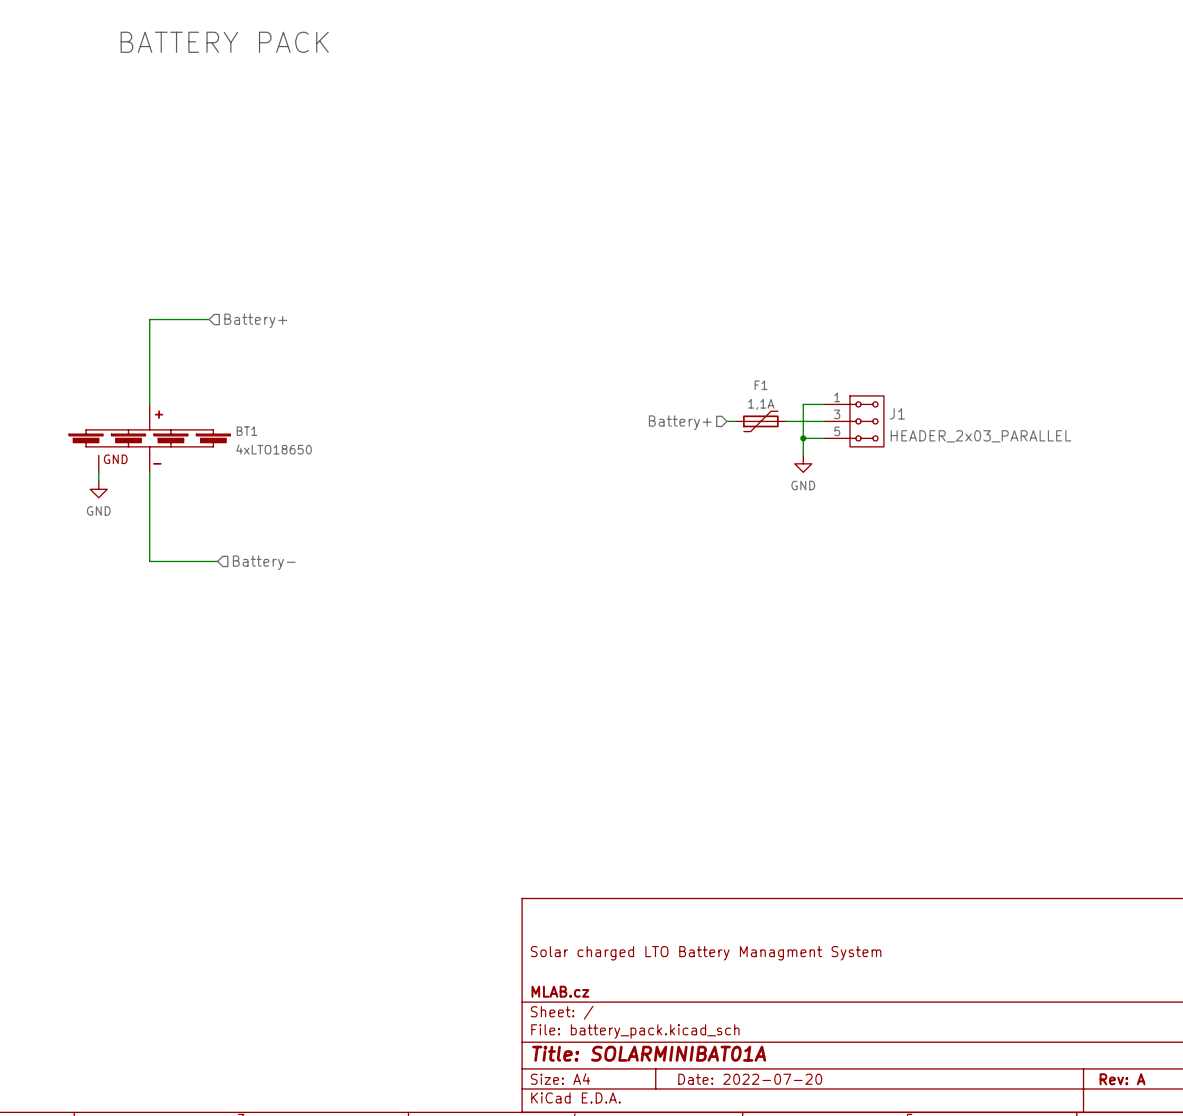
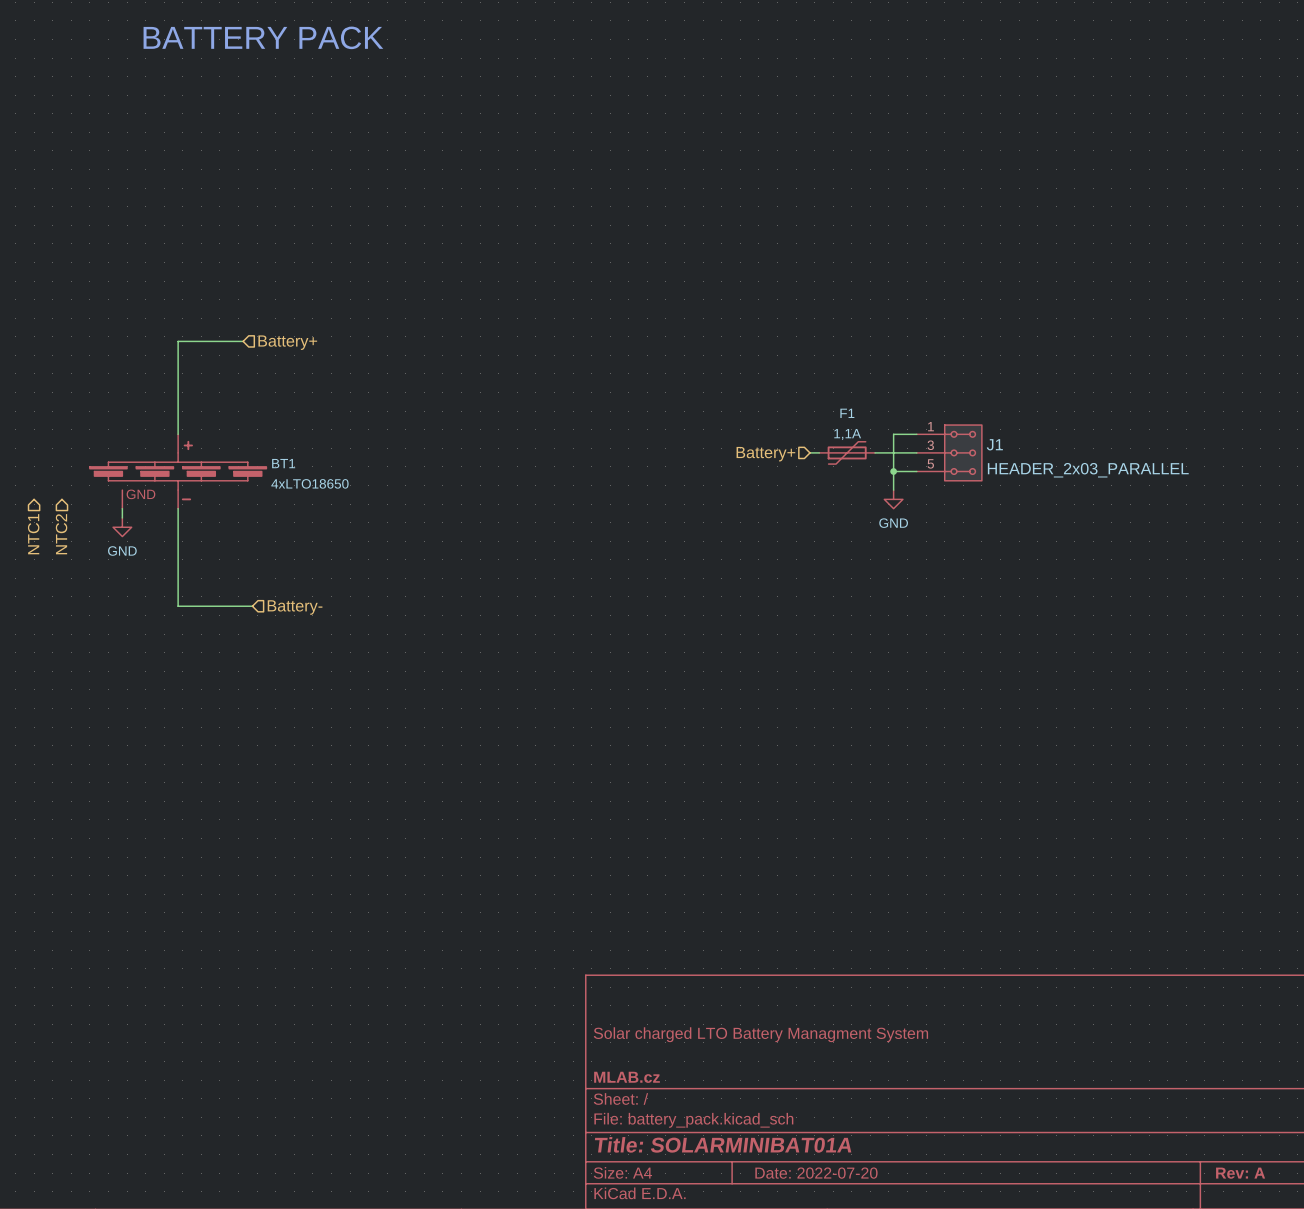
hierarchical label: none -> NTC1 (33, 534)
hierarchical label: none -> NTC2 (61, 534)

